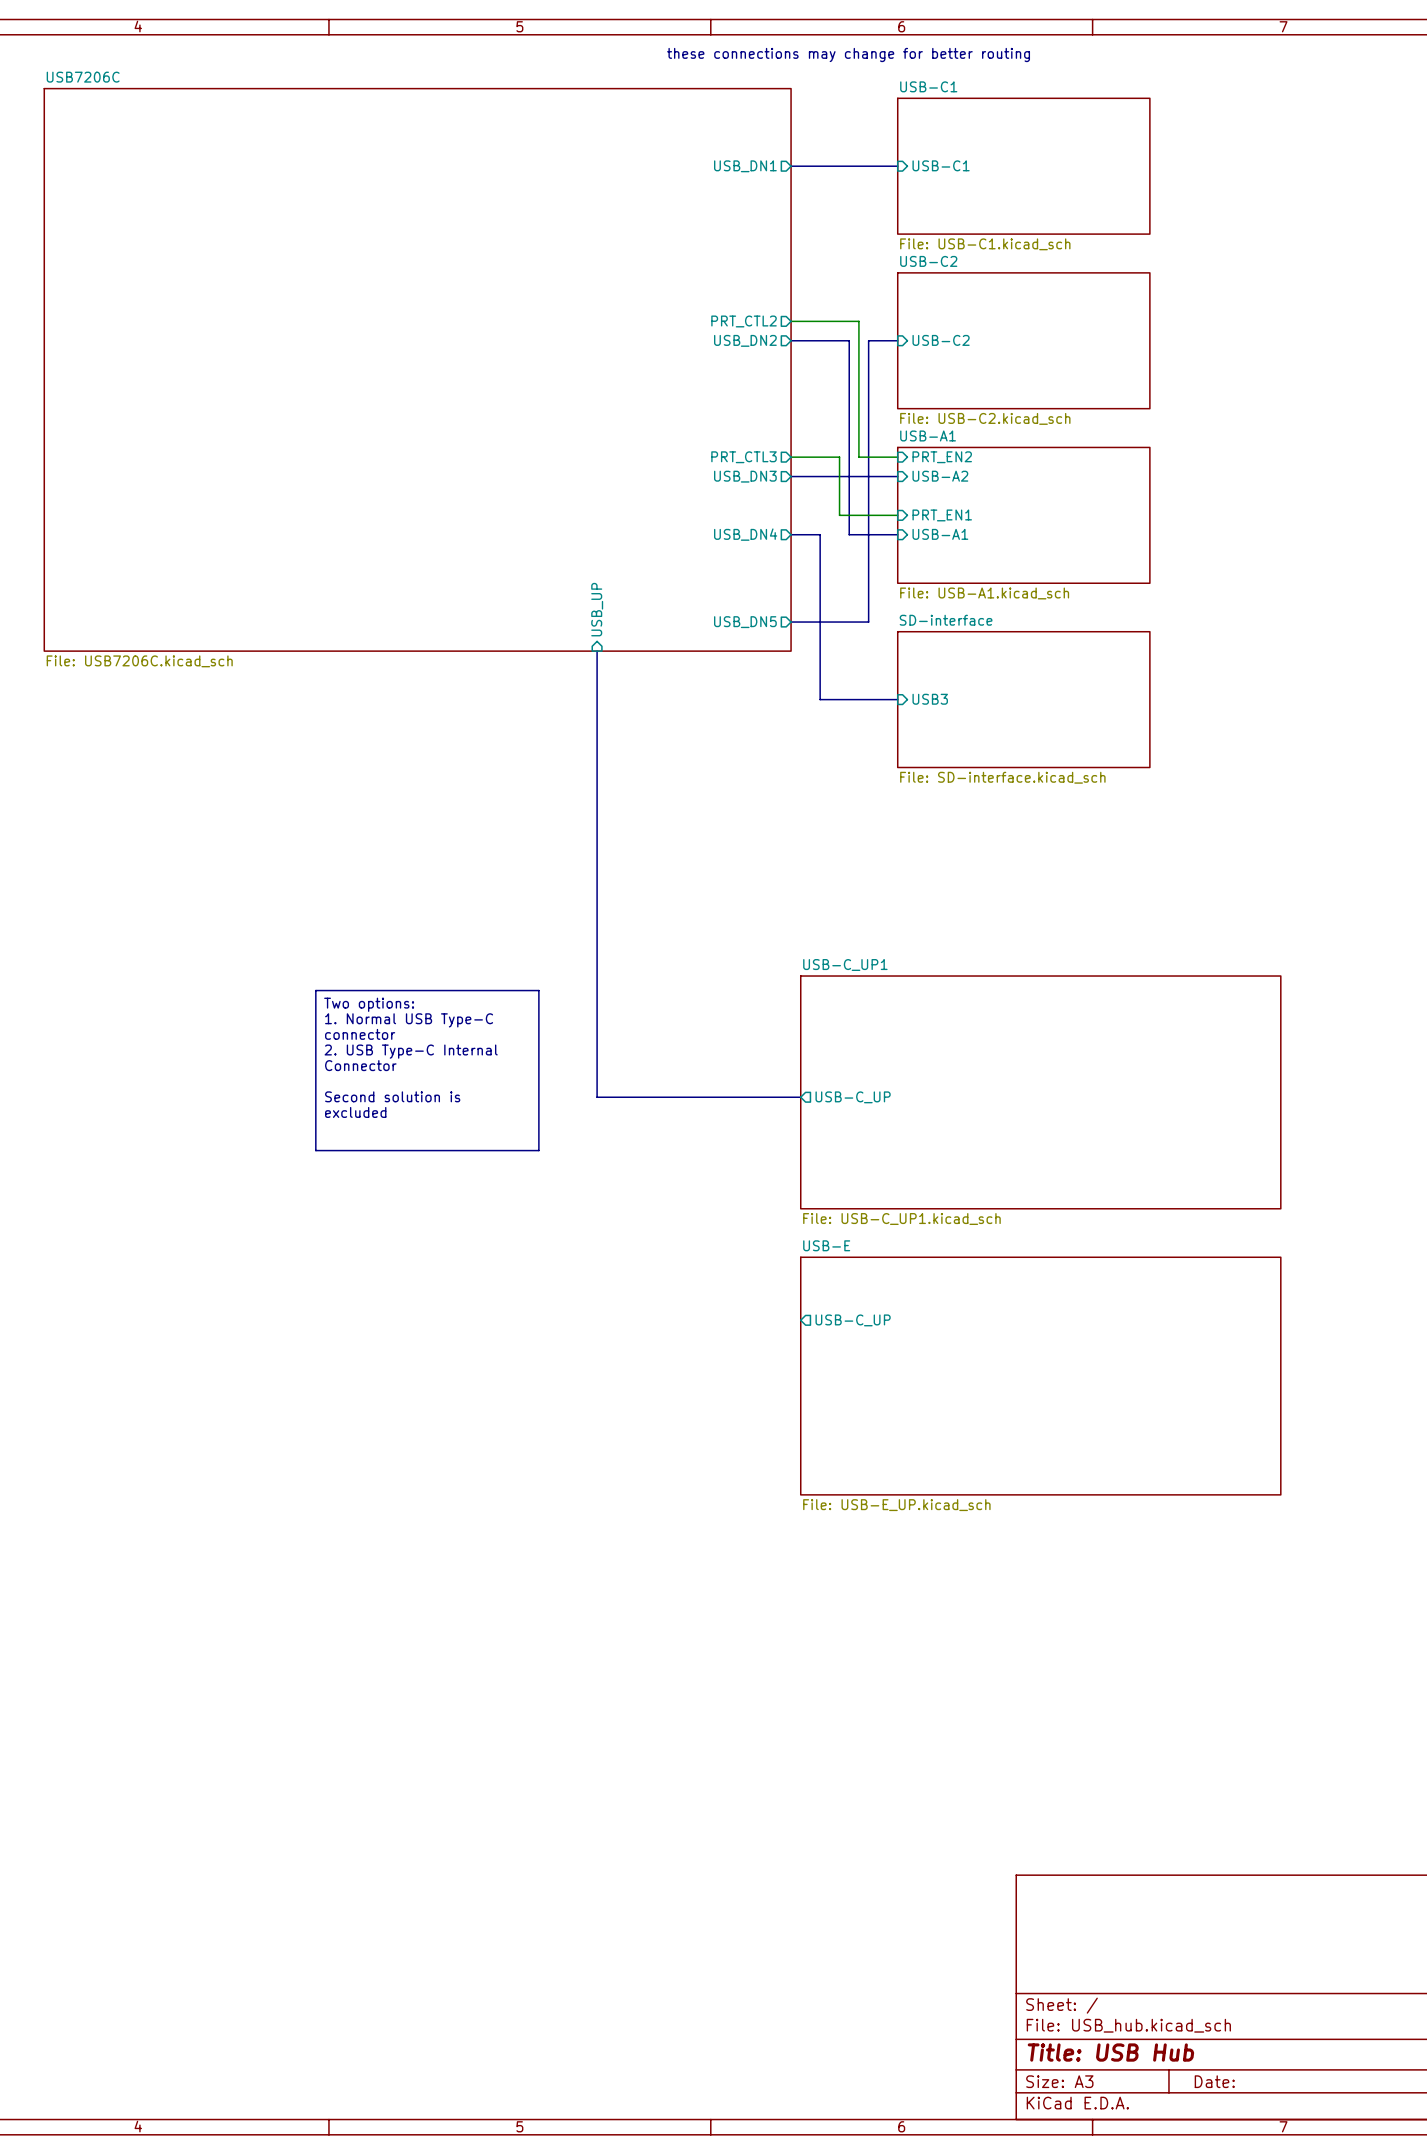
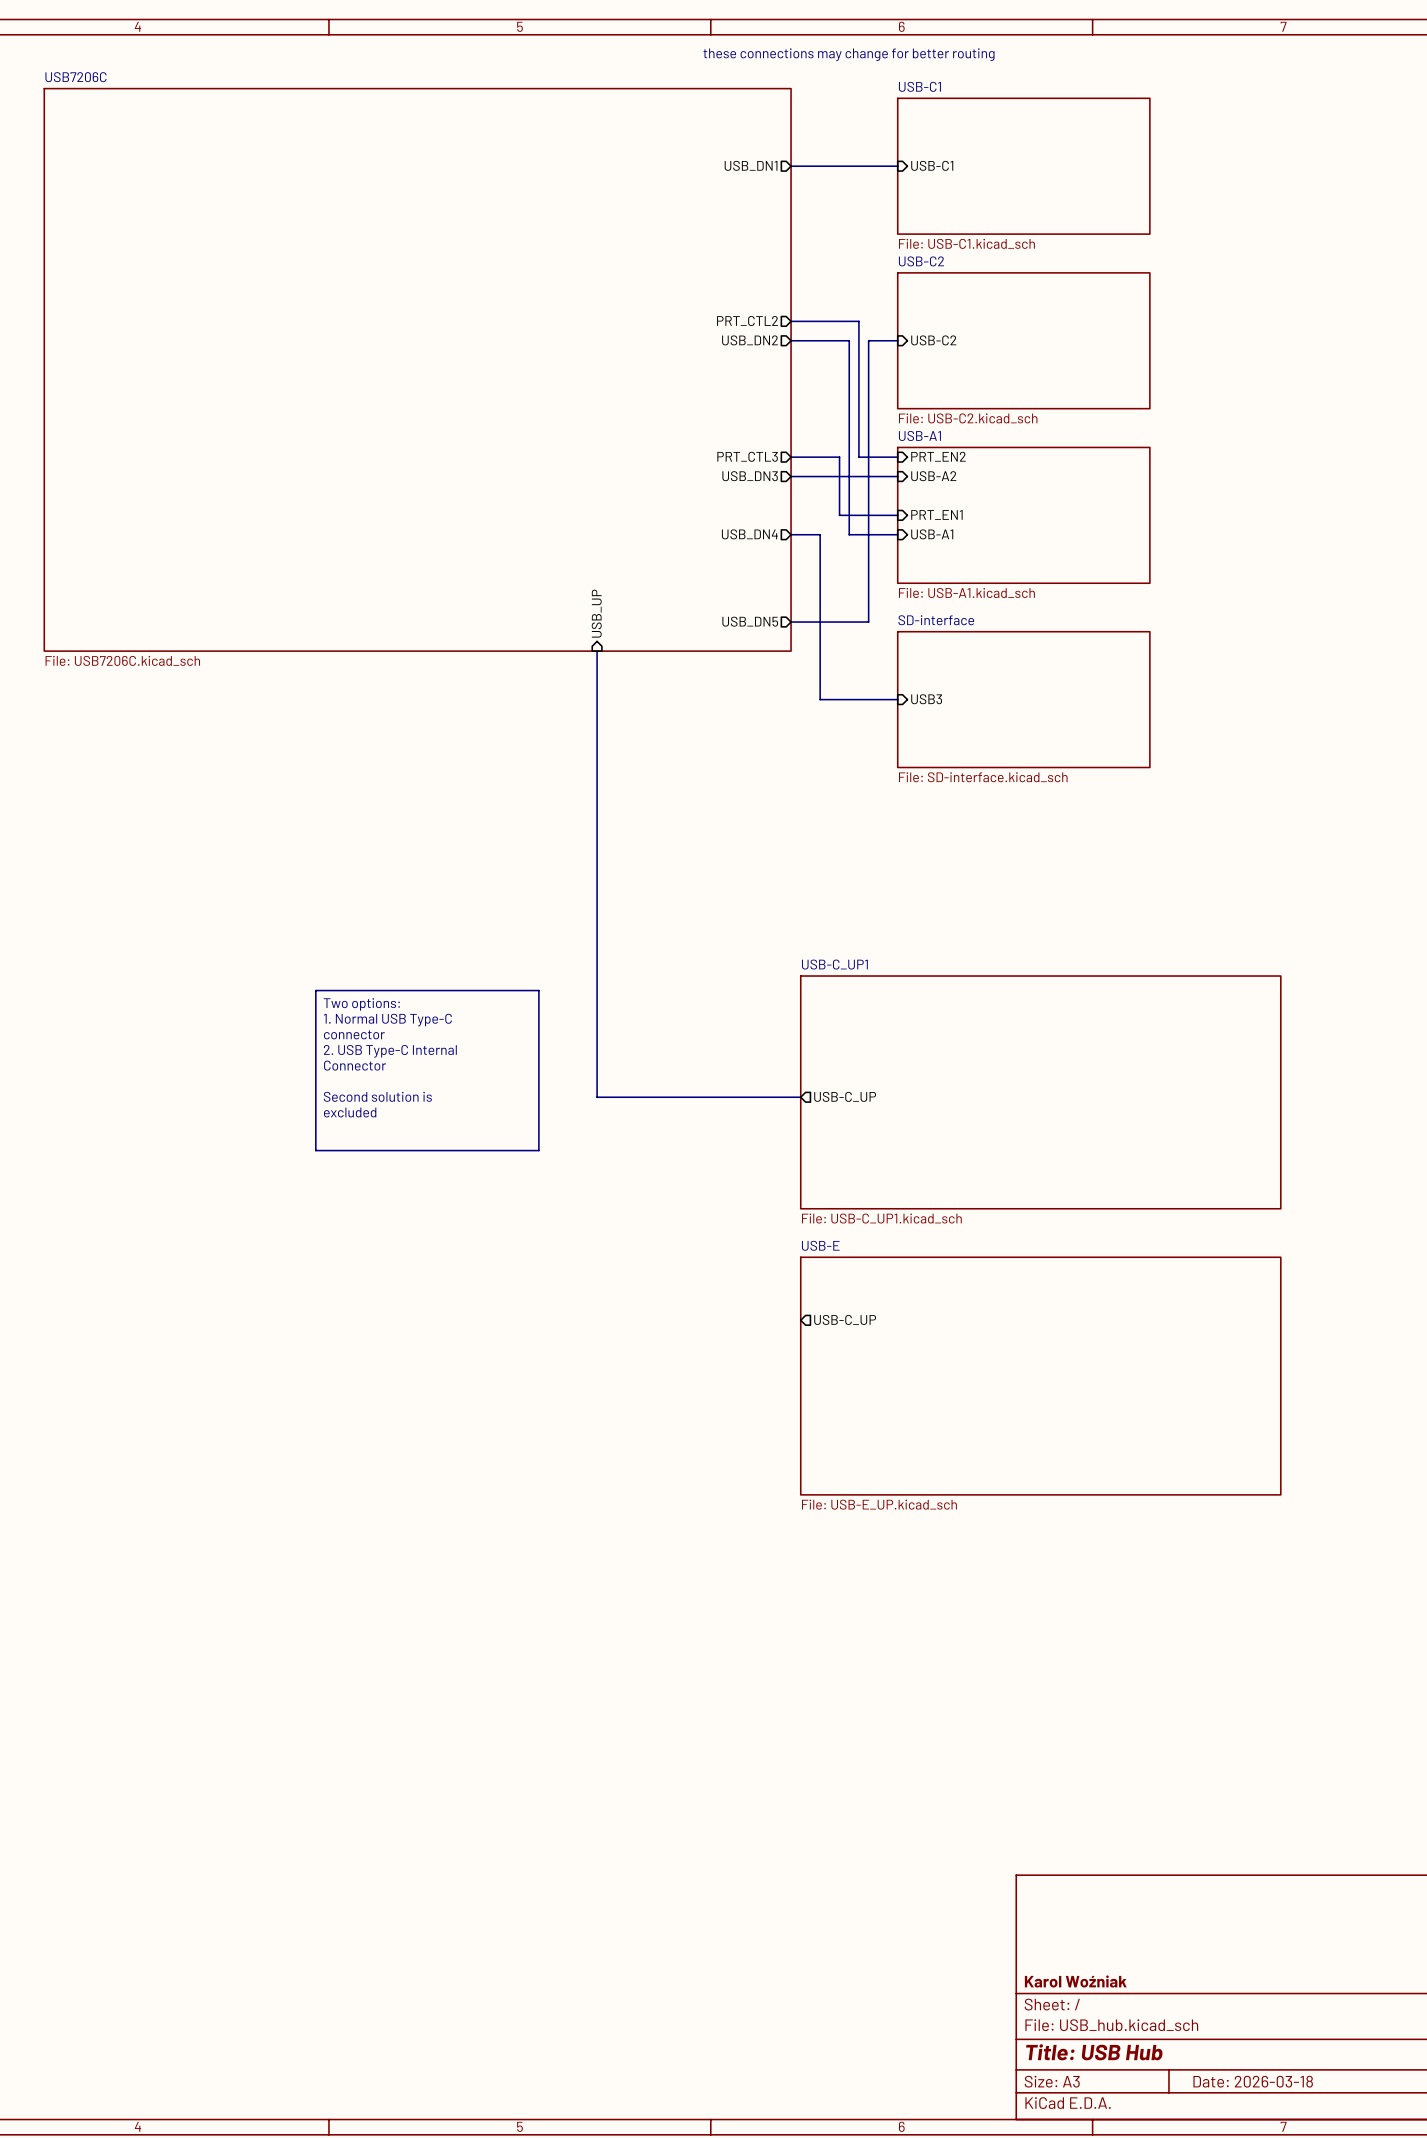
title block: none -> Karol Woźniak (1075, 1981)
title block: Date: (1214, 2081) -> Date: 2026-03-18 (1253, 2081)

